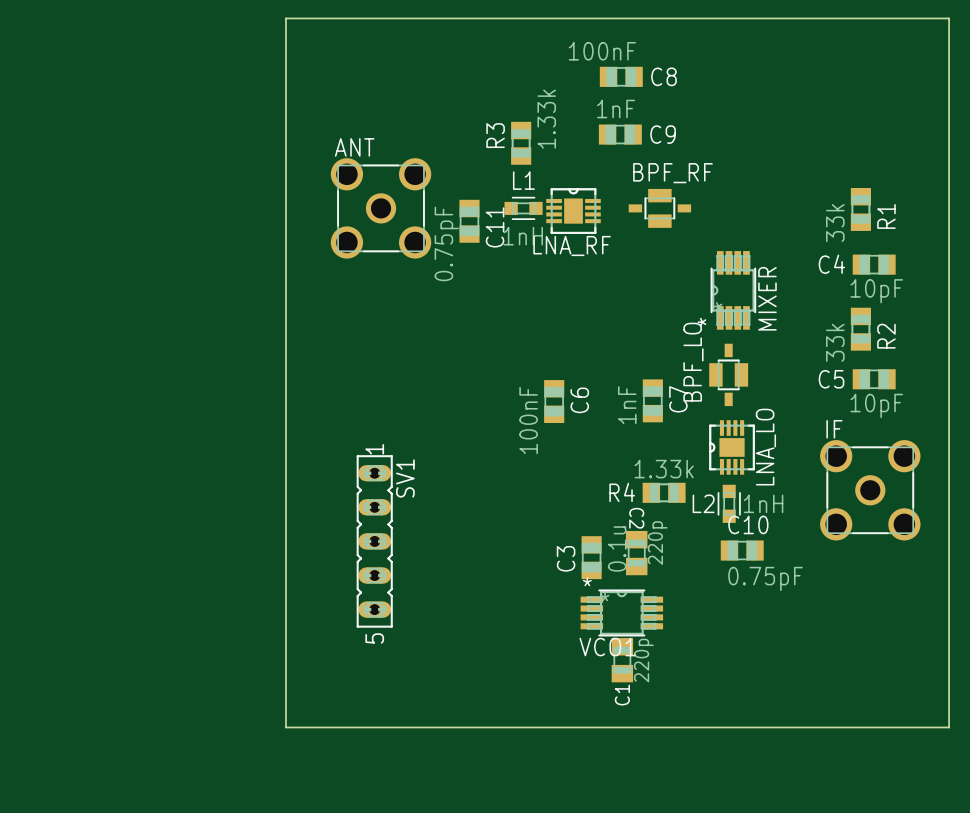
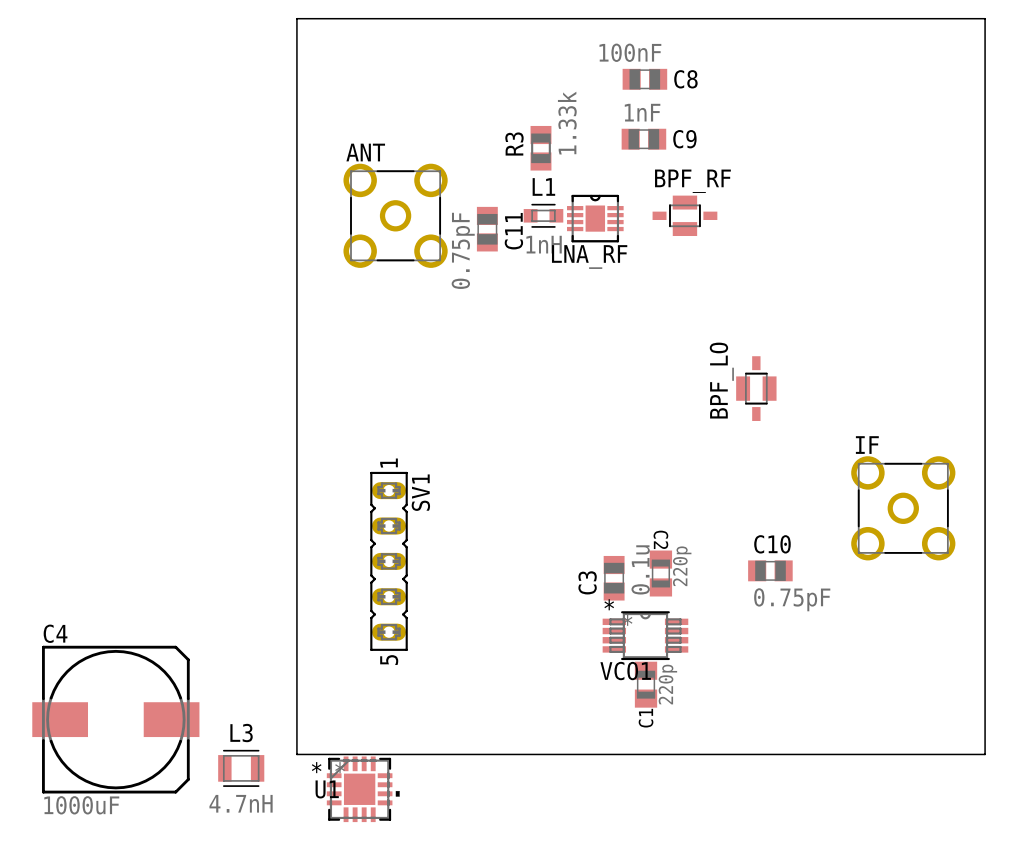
R1: 33k (860, 209) -> none
C4 footprint: [852, 254, 896, 275] -> [32, 645, 200, 794]
C4 name position: C4 (831, 264) -> C4 (55, 633)
MIXER: (733, 290) -> none
C4 value: 10pF (876, 291) -> 1000uF (81, 805)
R2: 33k (860, 329) -> none
C5: 10pF (874, 379) -> none
C7: 1nF (652, 400) -> none
C6: 100nF (554, 401) -> none
LNA_LO: (732, 447) -> none
R4: 1.33k (664, 492) -> none
L2: 1nH (729, 503) -> none
L3: none -> 4.7nH (241, 768)
U1: none -> (363, 789)

